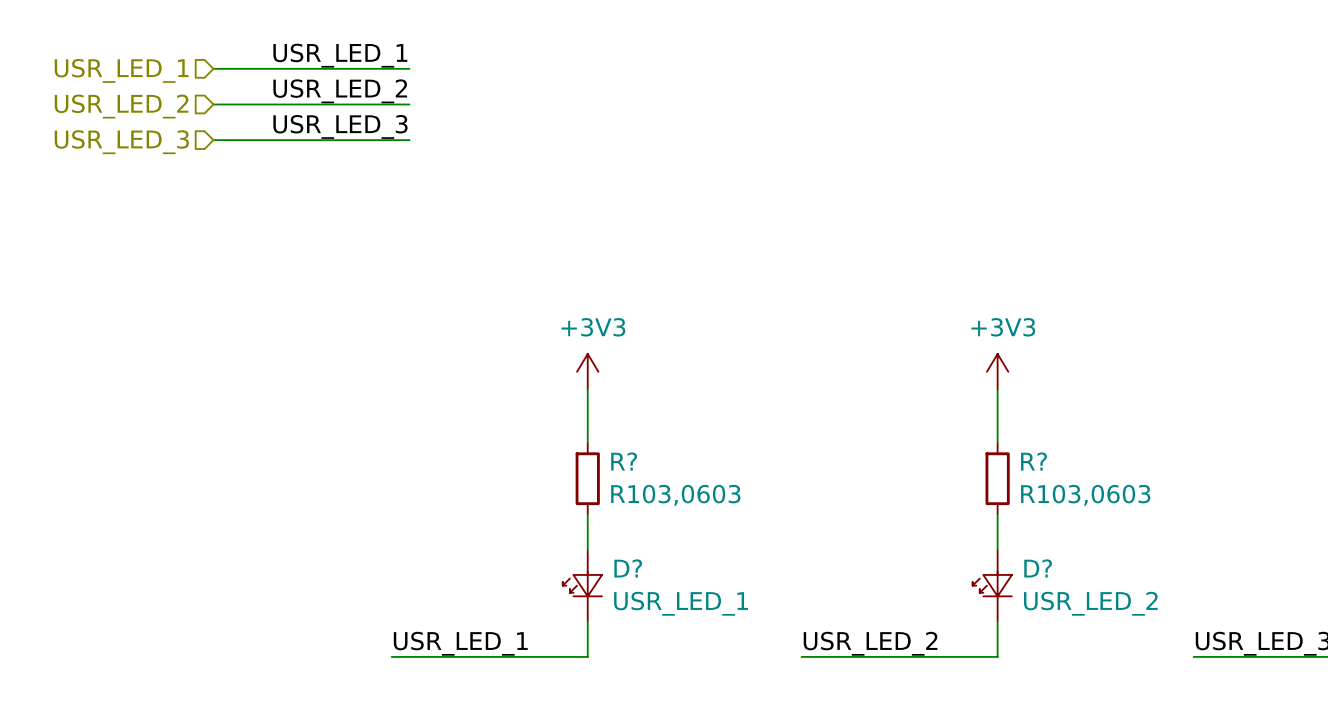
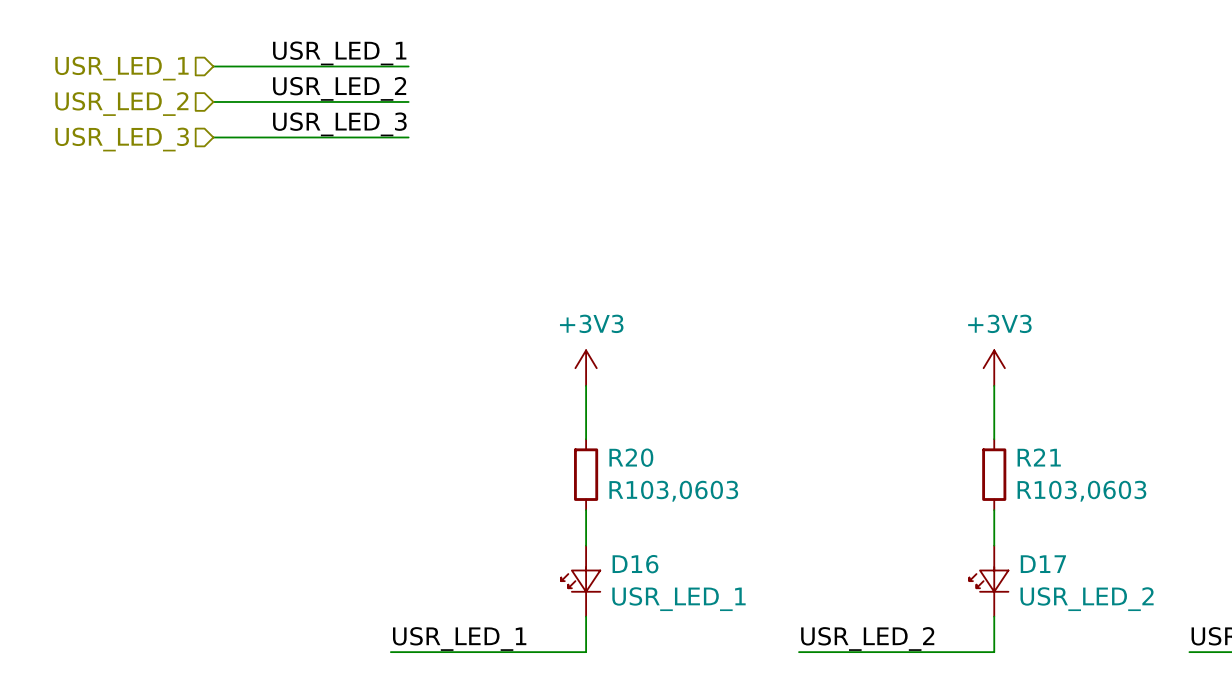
R? name: R? (624, 461) -> R20 (631, 457)
R? name: R? (1033, 461) -> R21 (1039, 457)
D? name: D? (628, 568) -> D16 (635, 564)
D? name: D? (1038, 568) -> D17 (1043, 564)

